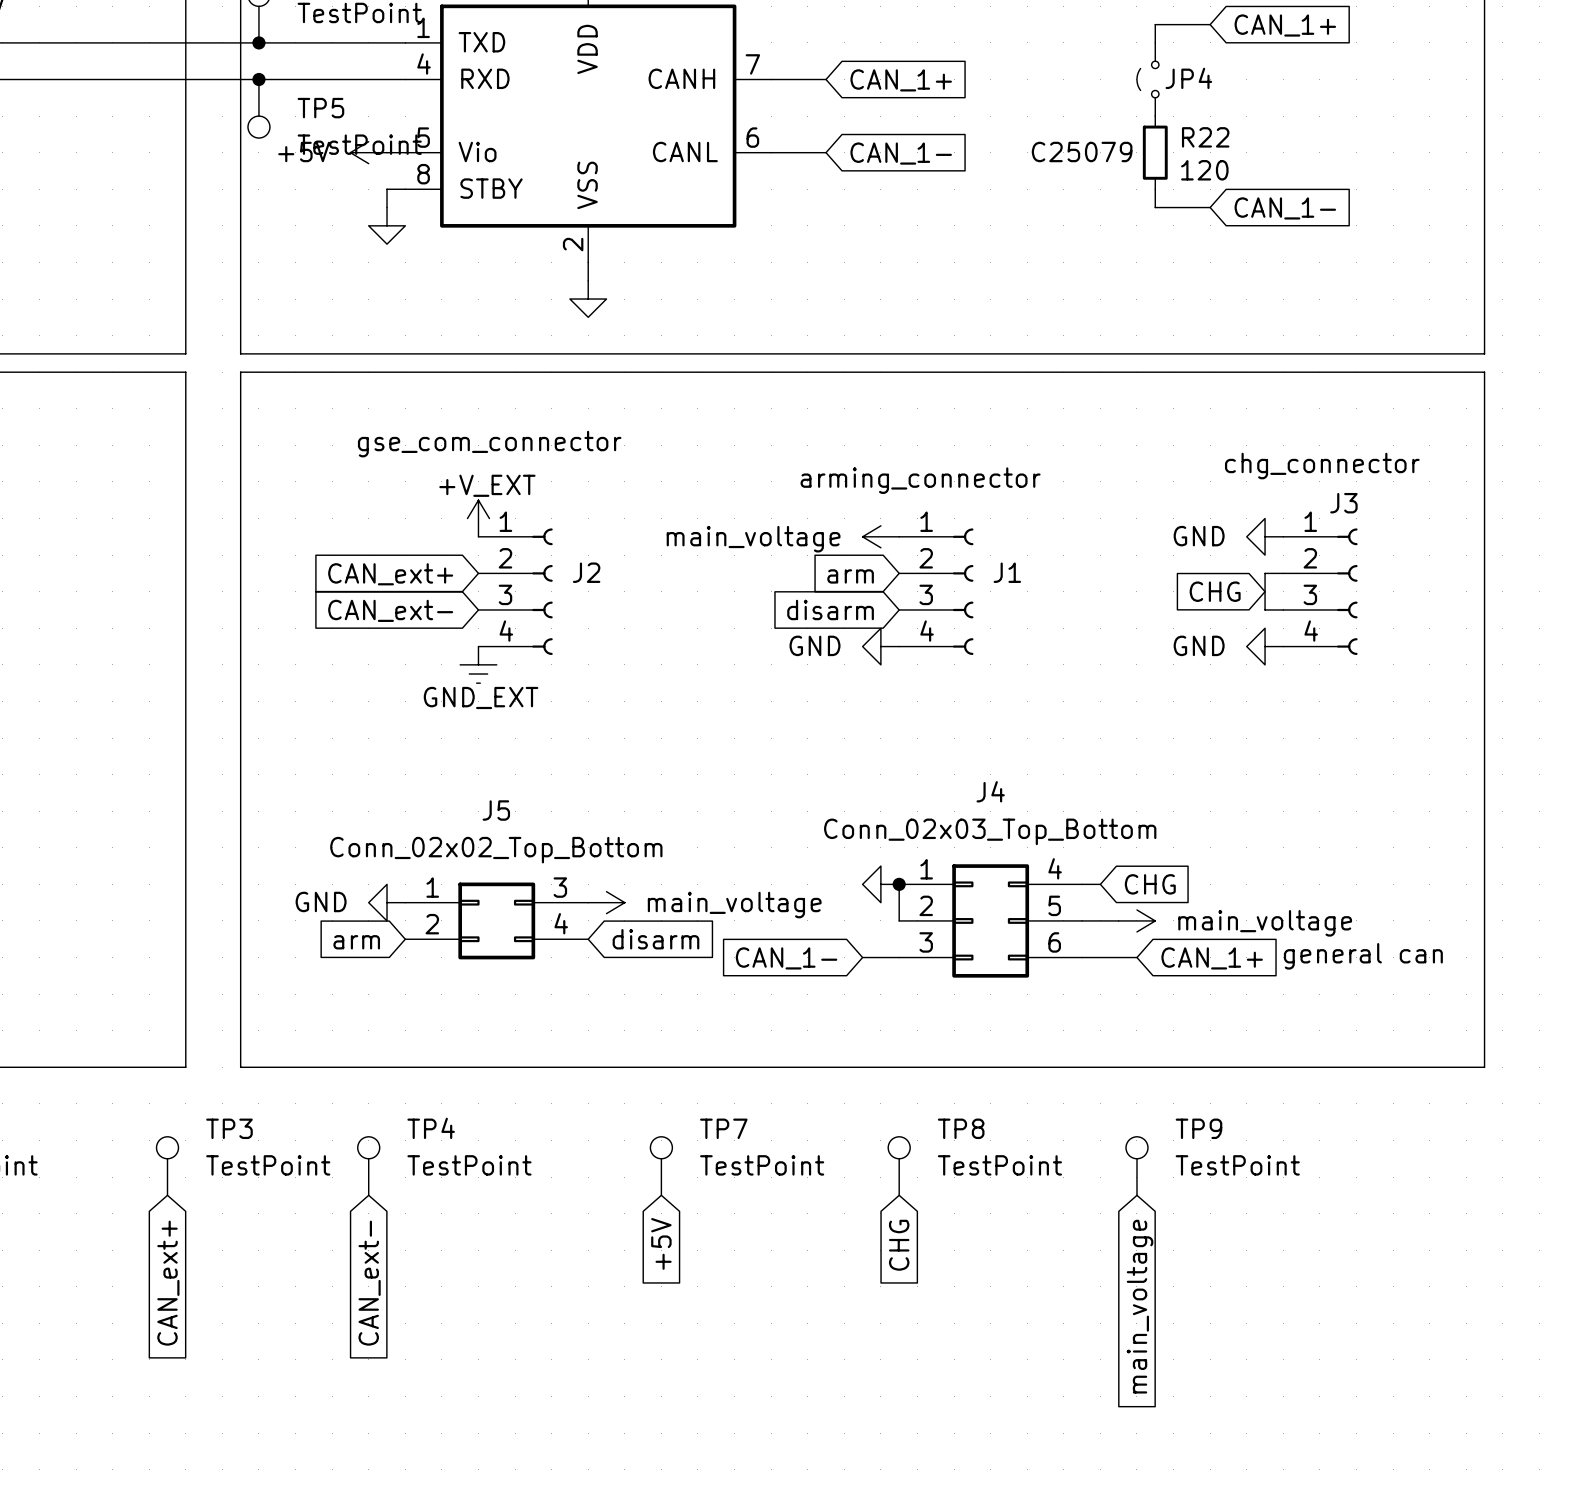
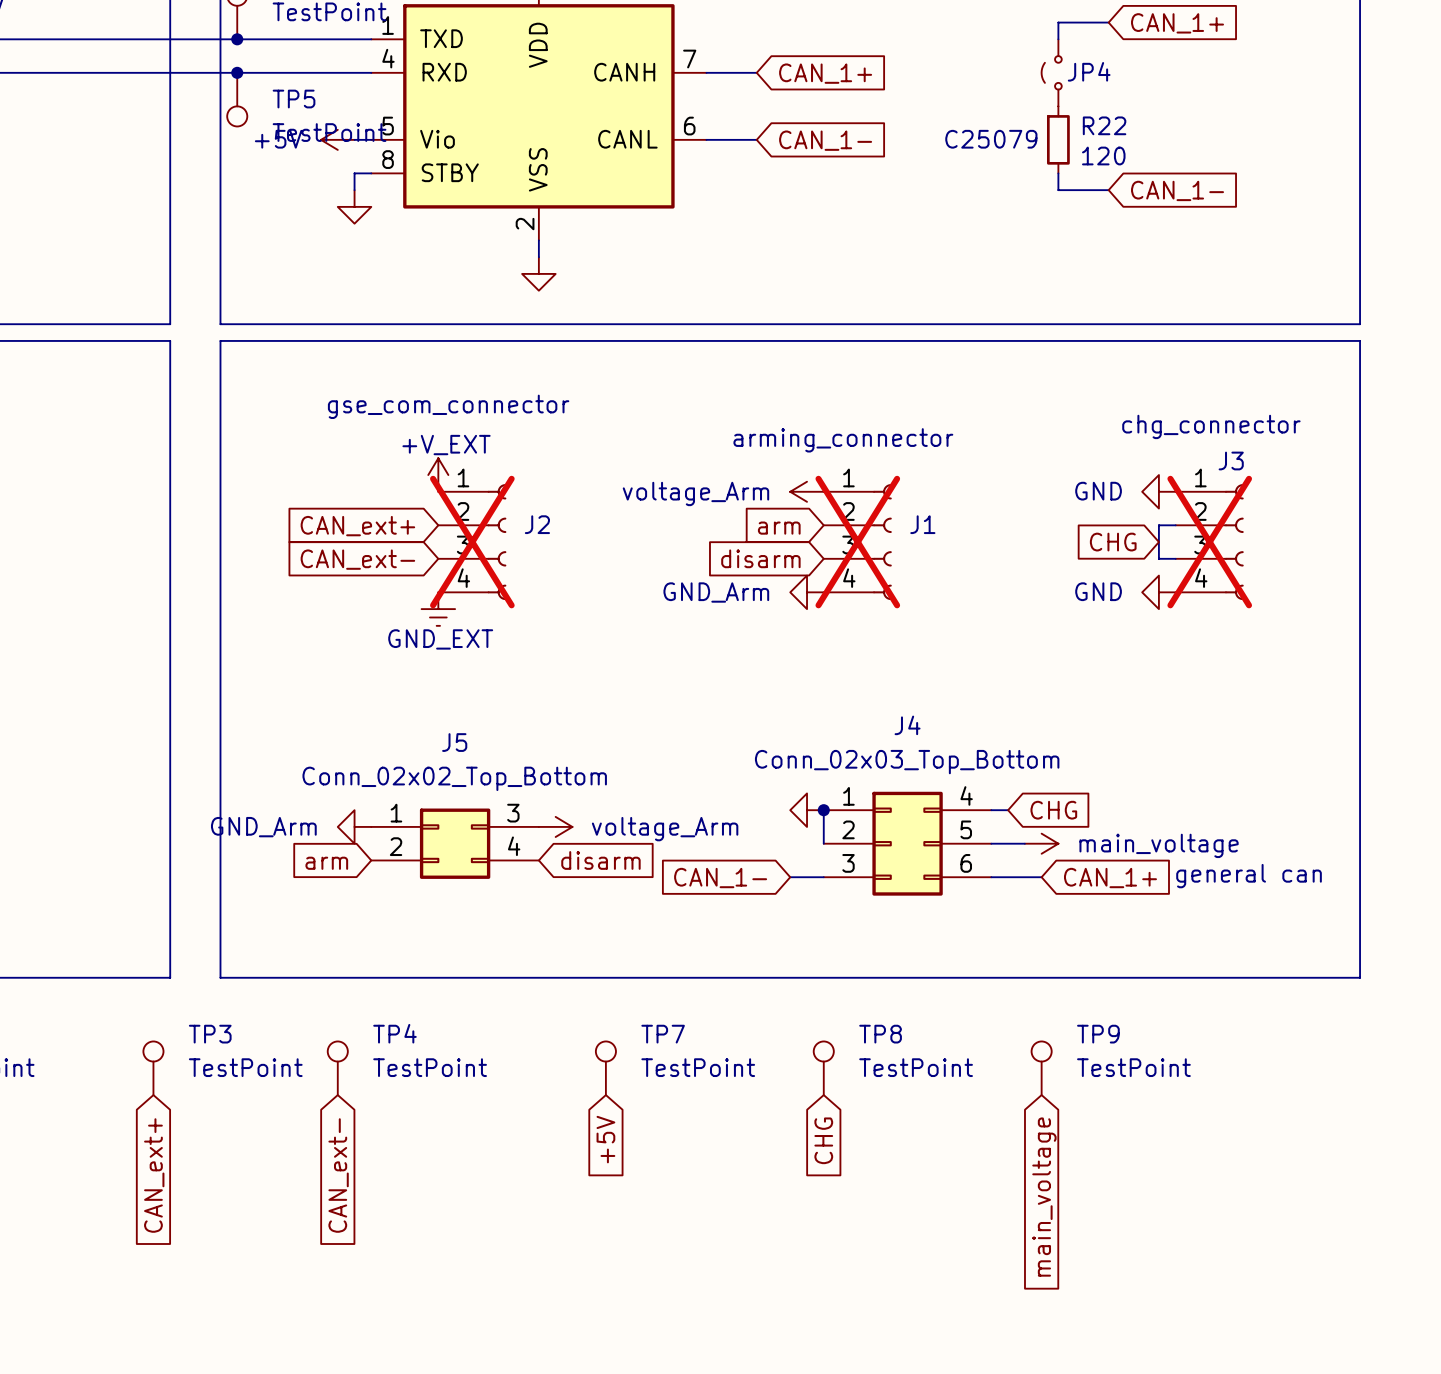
power symbol: main_voltage (880, 536) -> voltage_Arm (807, 491)
J2 do-not-place cross: none -> (472, 542)
J1 do-not-place cross: none -> (857, 542)
J3 do-not-place cross: none -> (1209, 542)
power symbol: GND (880, 646) -> GND_Arm (807, 592)
power symbol: GND (387, 902) -> GND_Arm (354, 826)
power symbol: main_voltage (606, 902) -> voltage_Arm (555, 826)

